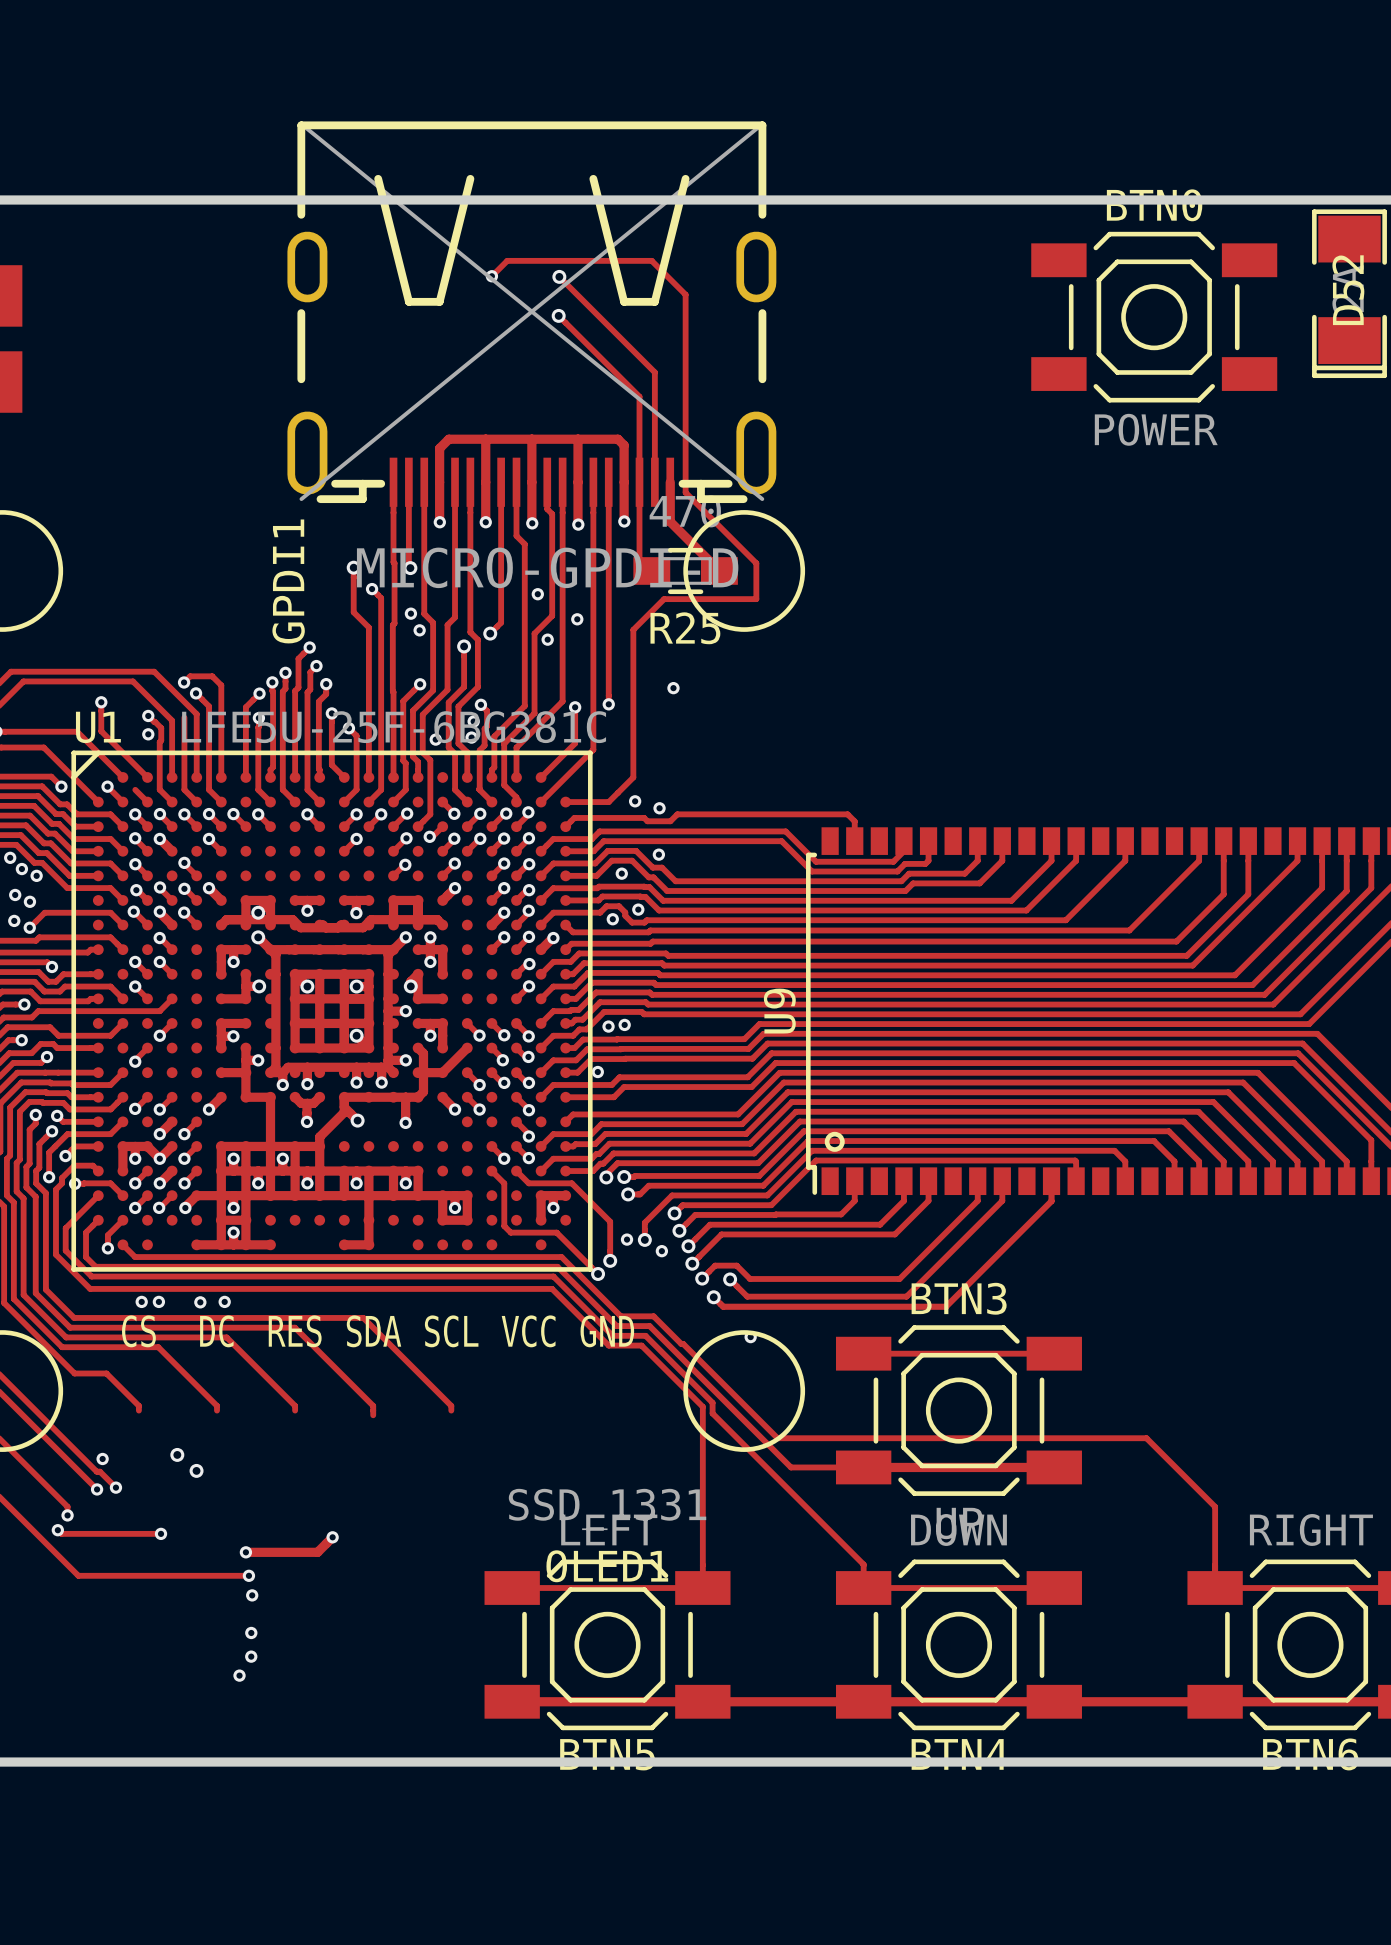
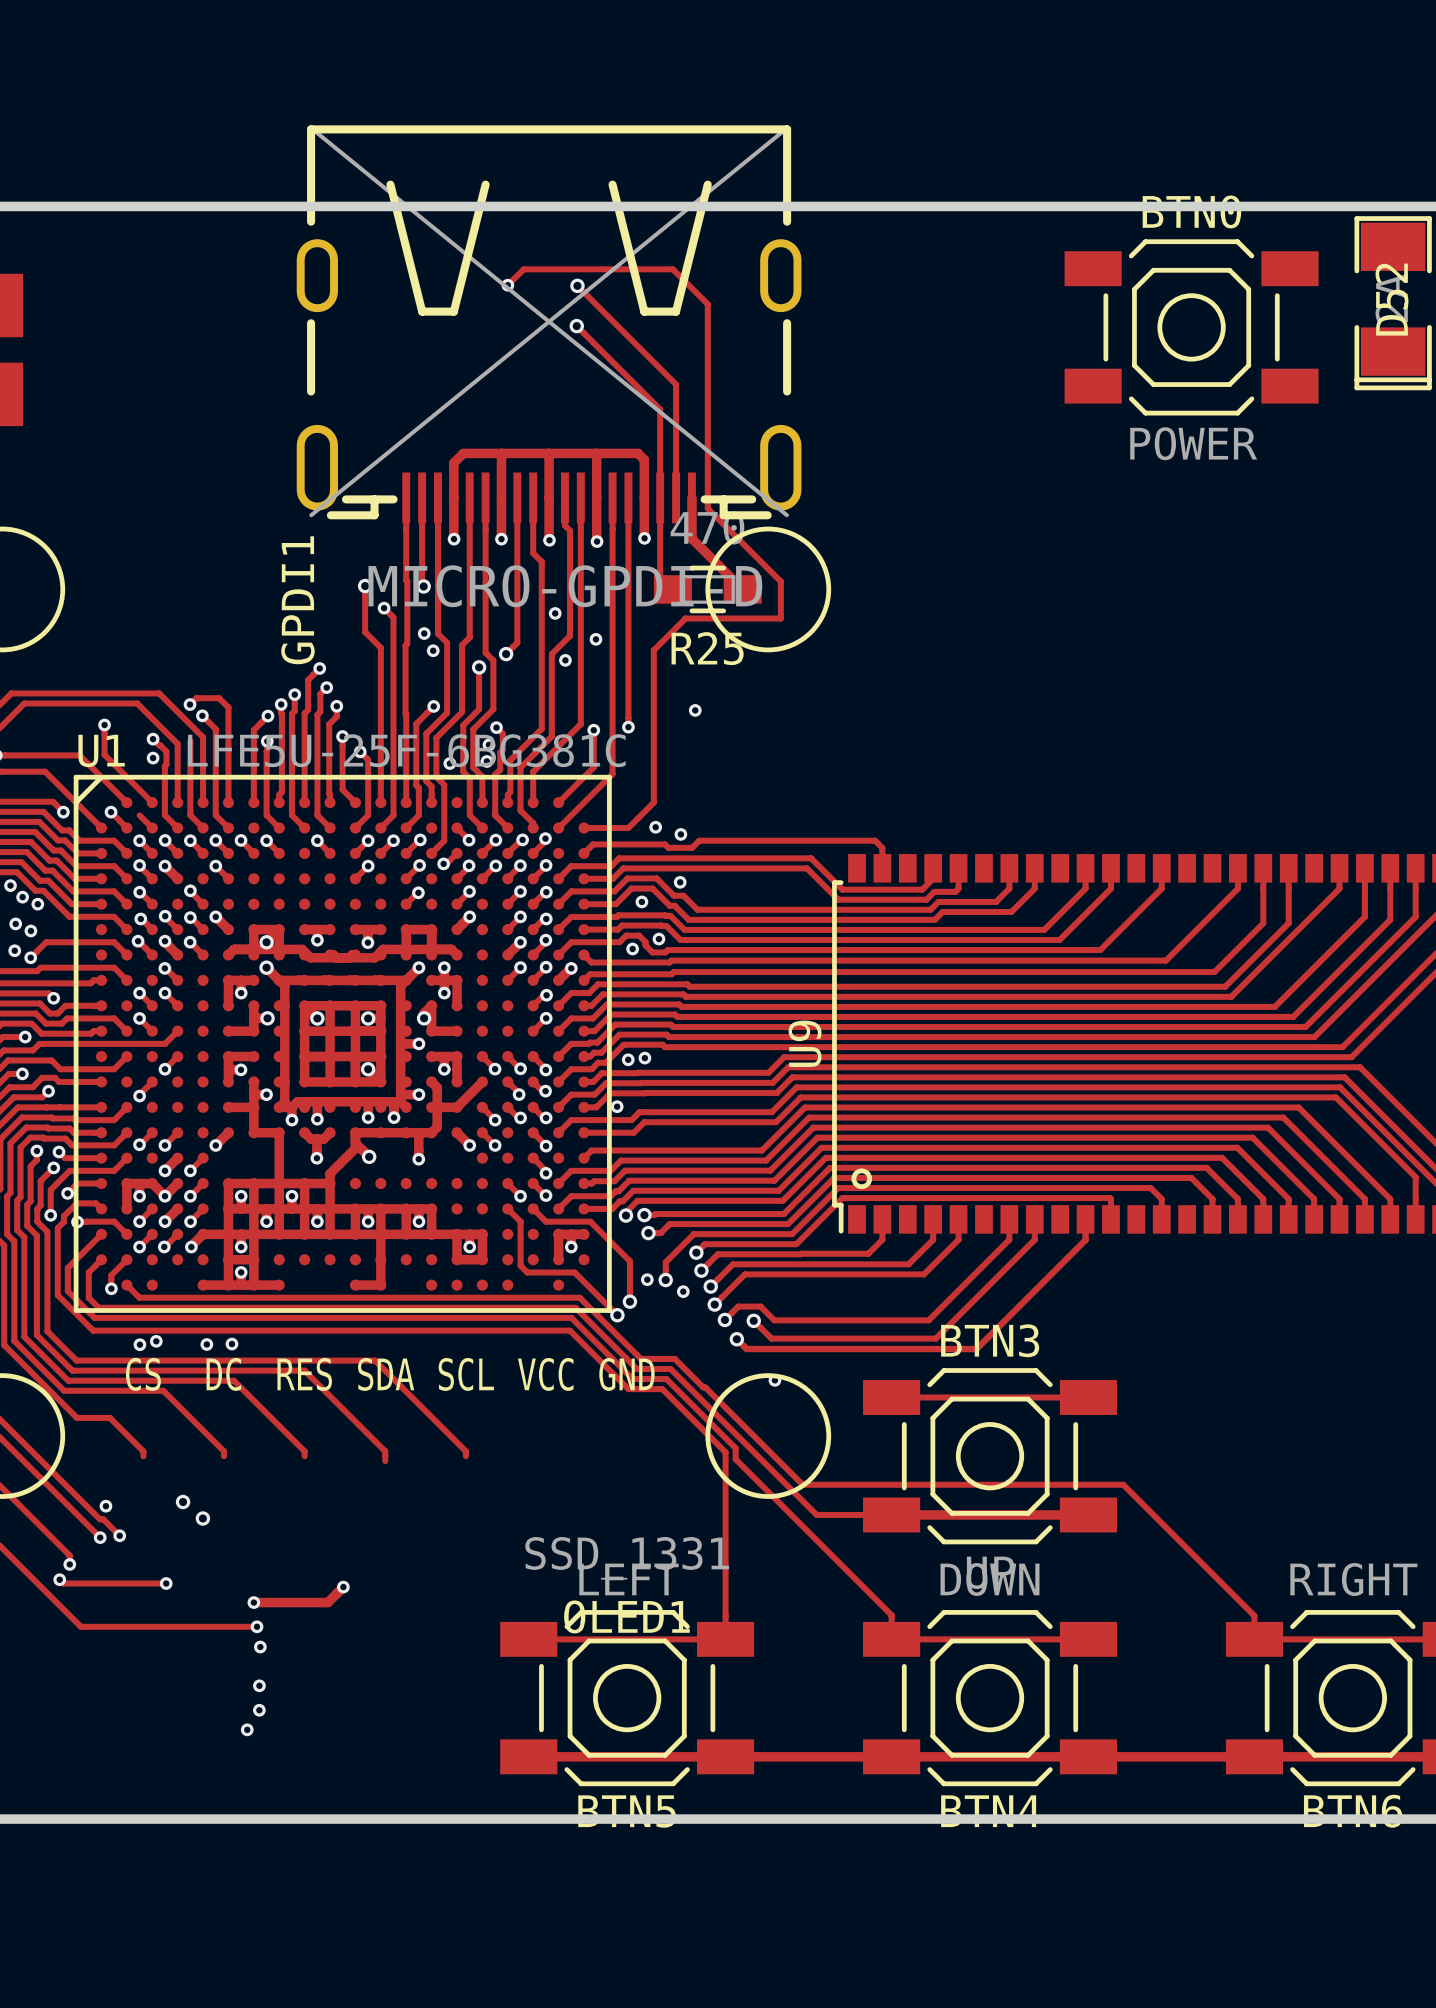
via: none -> (156, 1341)
via: (141, 1301) -> none
via: (158, 1301) -> none
via: none -> (139, 1344)
track: (1088, 1438) (1146, 1438) (1215, 1506) (1215, 1565) -> (1123, 1484) (1254, 1615)

